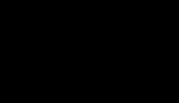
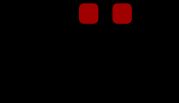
part: none -> (105, 13)

